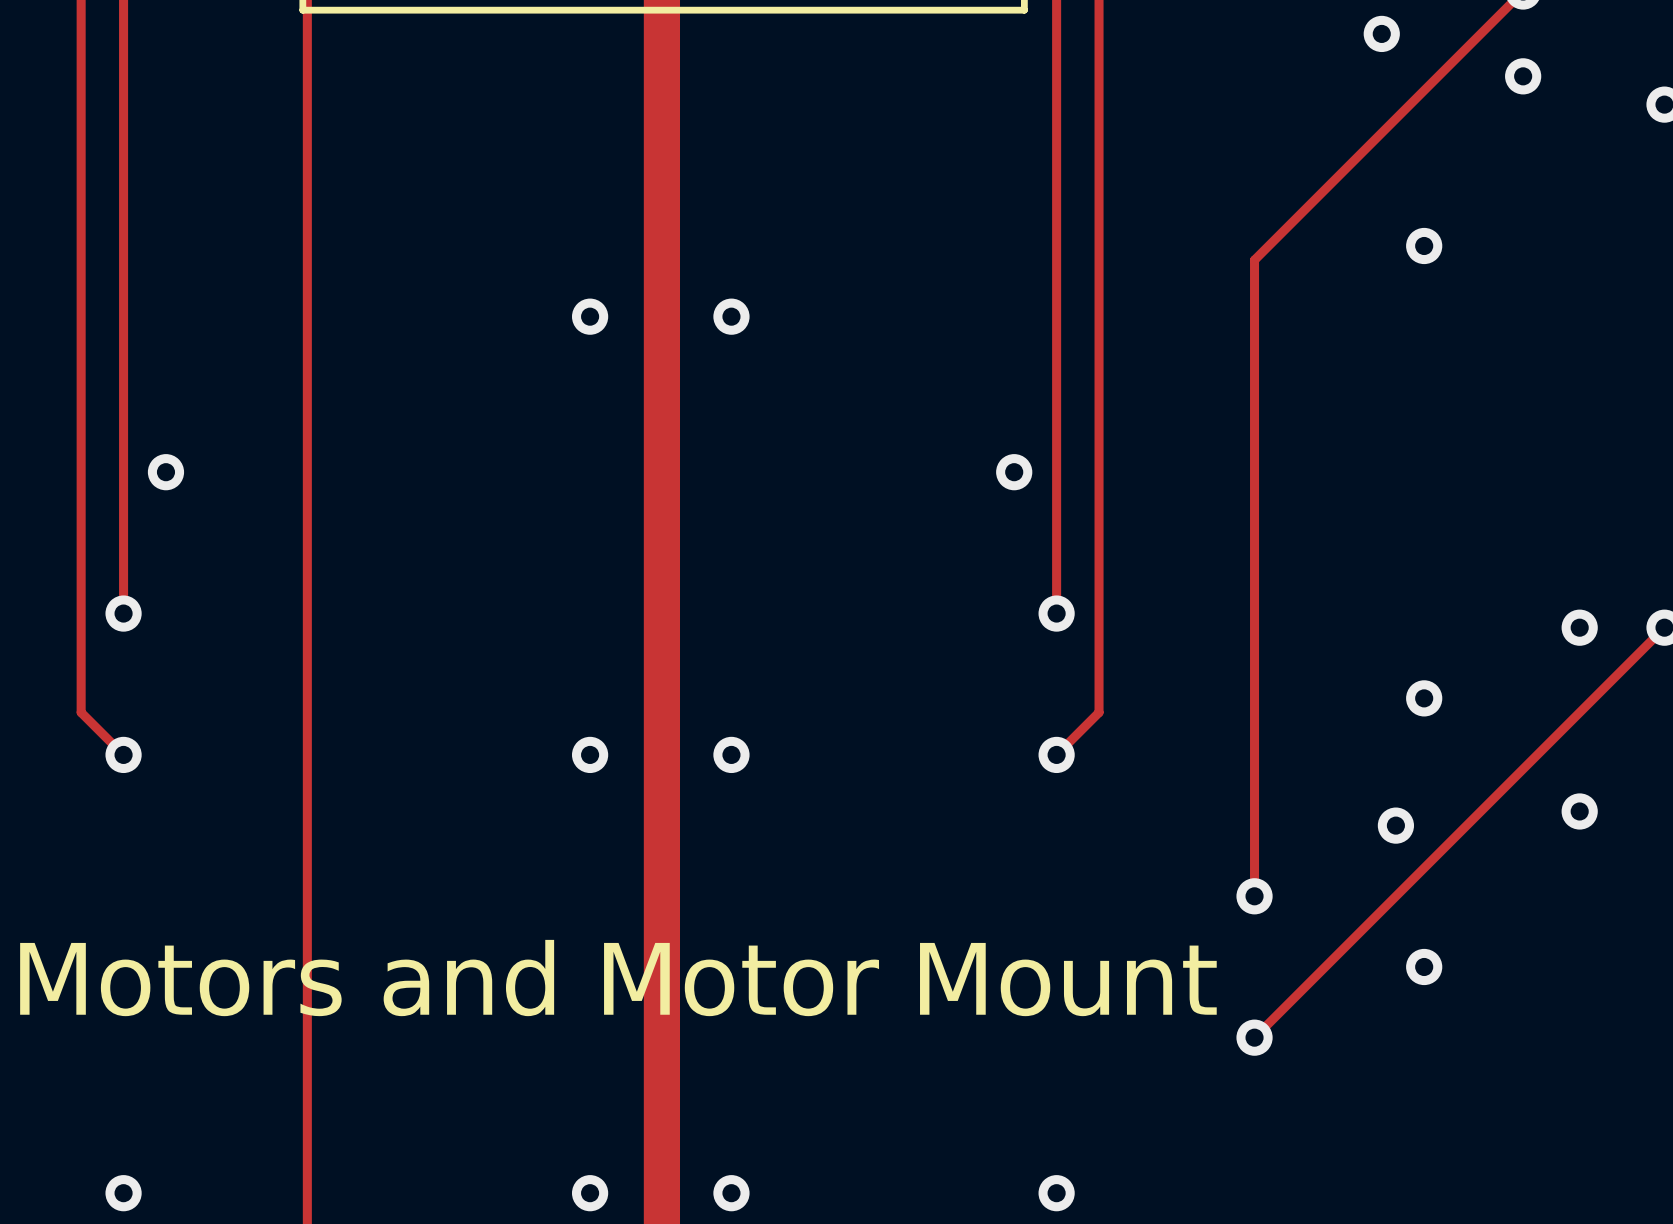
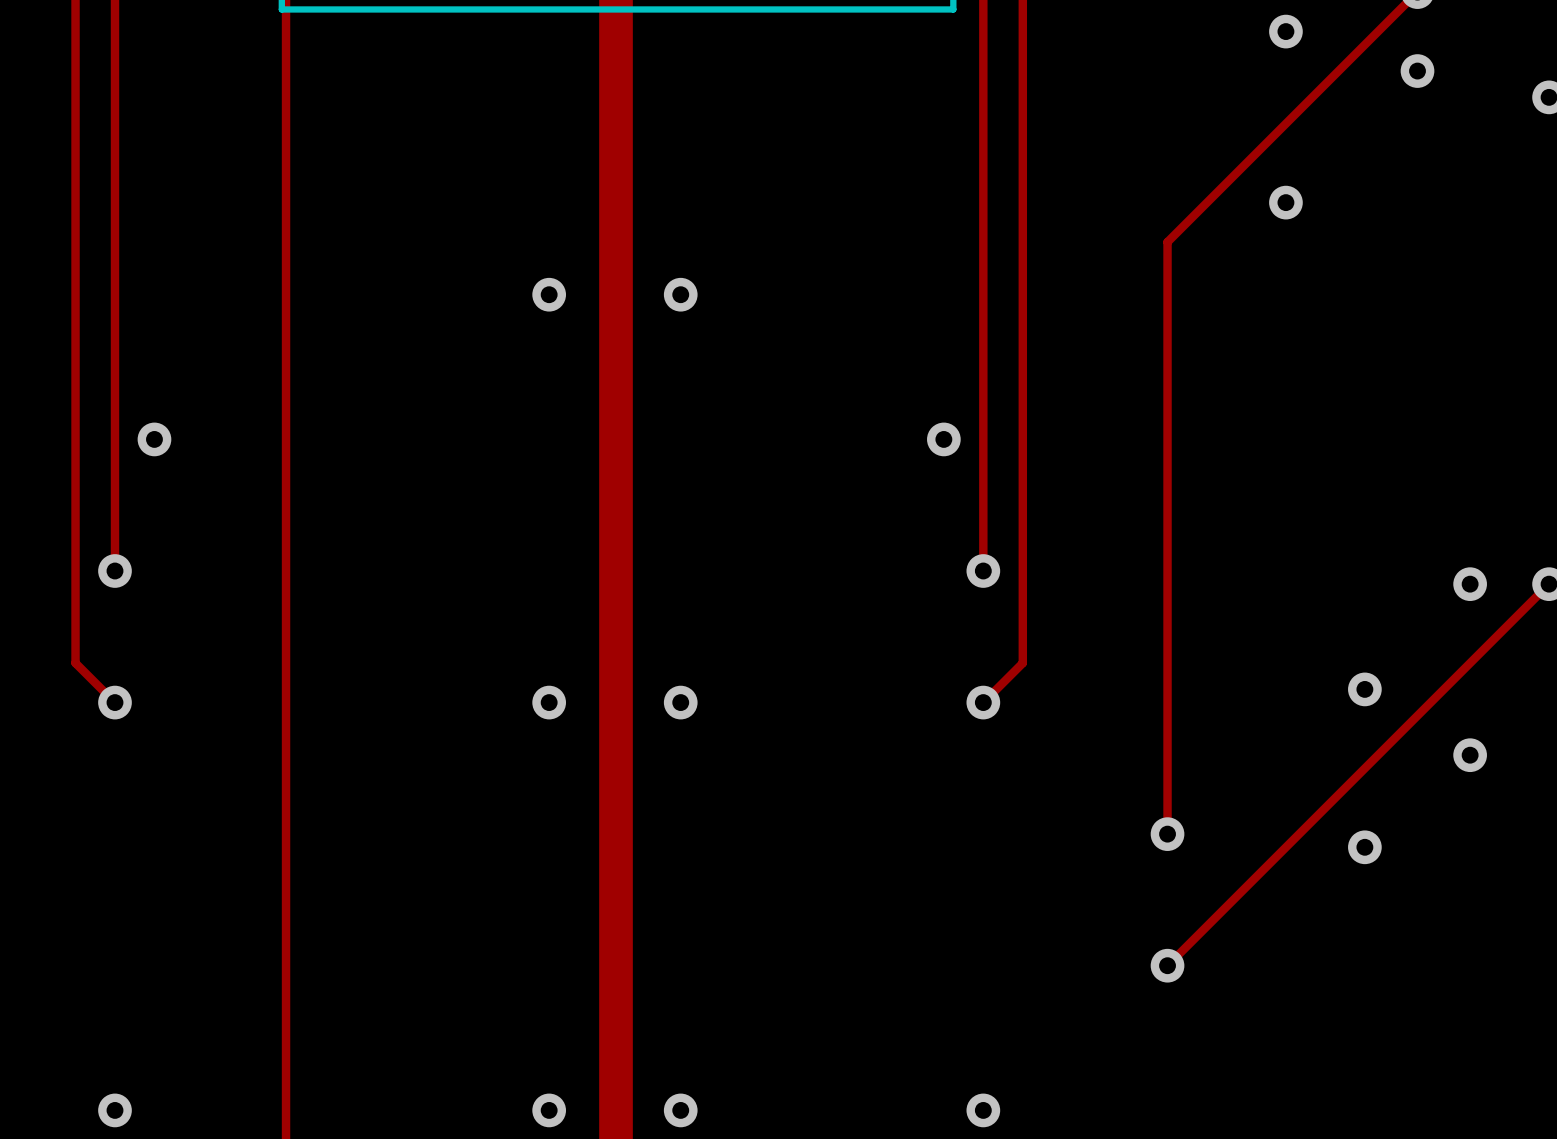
via position: (1424, 245) -> (1285, 202)
via: (1424, 698) -> none
via: none -> (1364, 689)
via: (1395, 825) -> none
via: none -> (1364, 847)
via: (1424, 966) -> none
text: Motors and Motor Mount (618, 978) -> none

